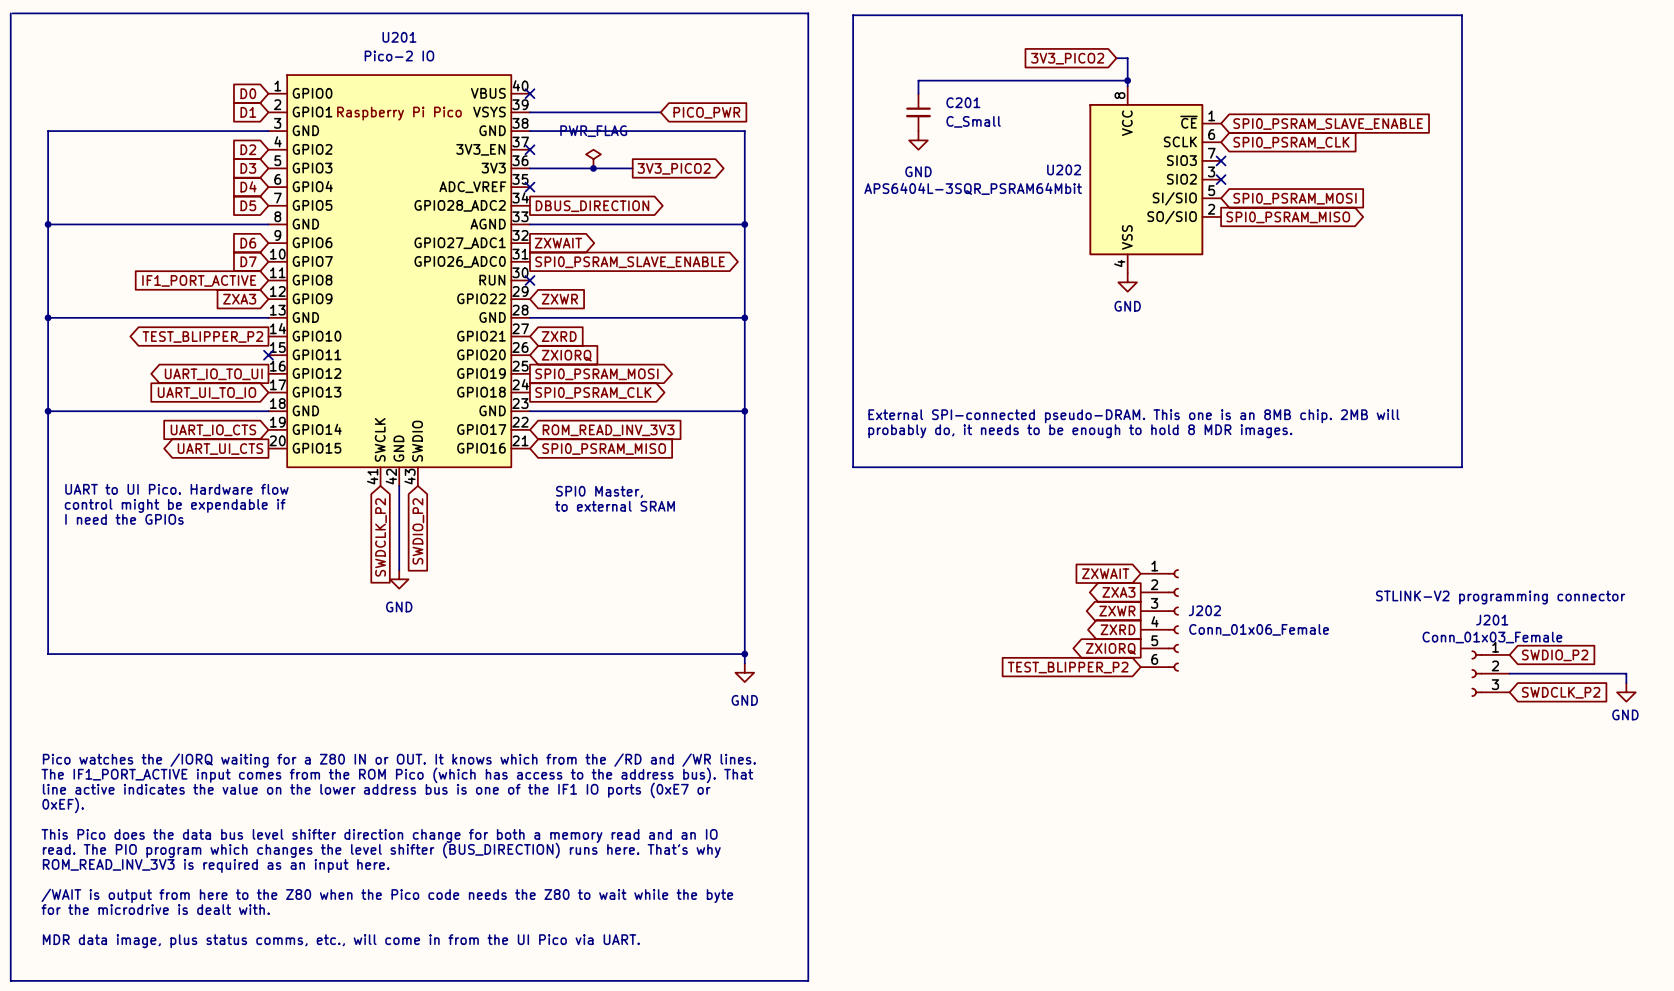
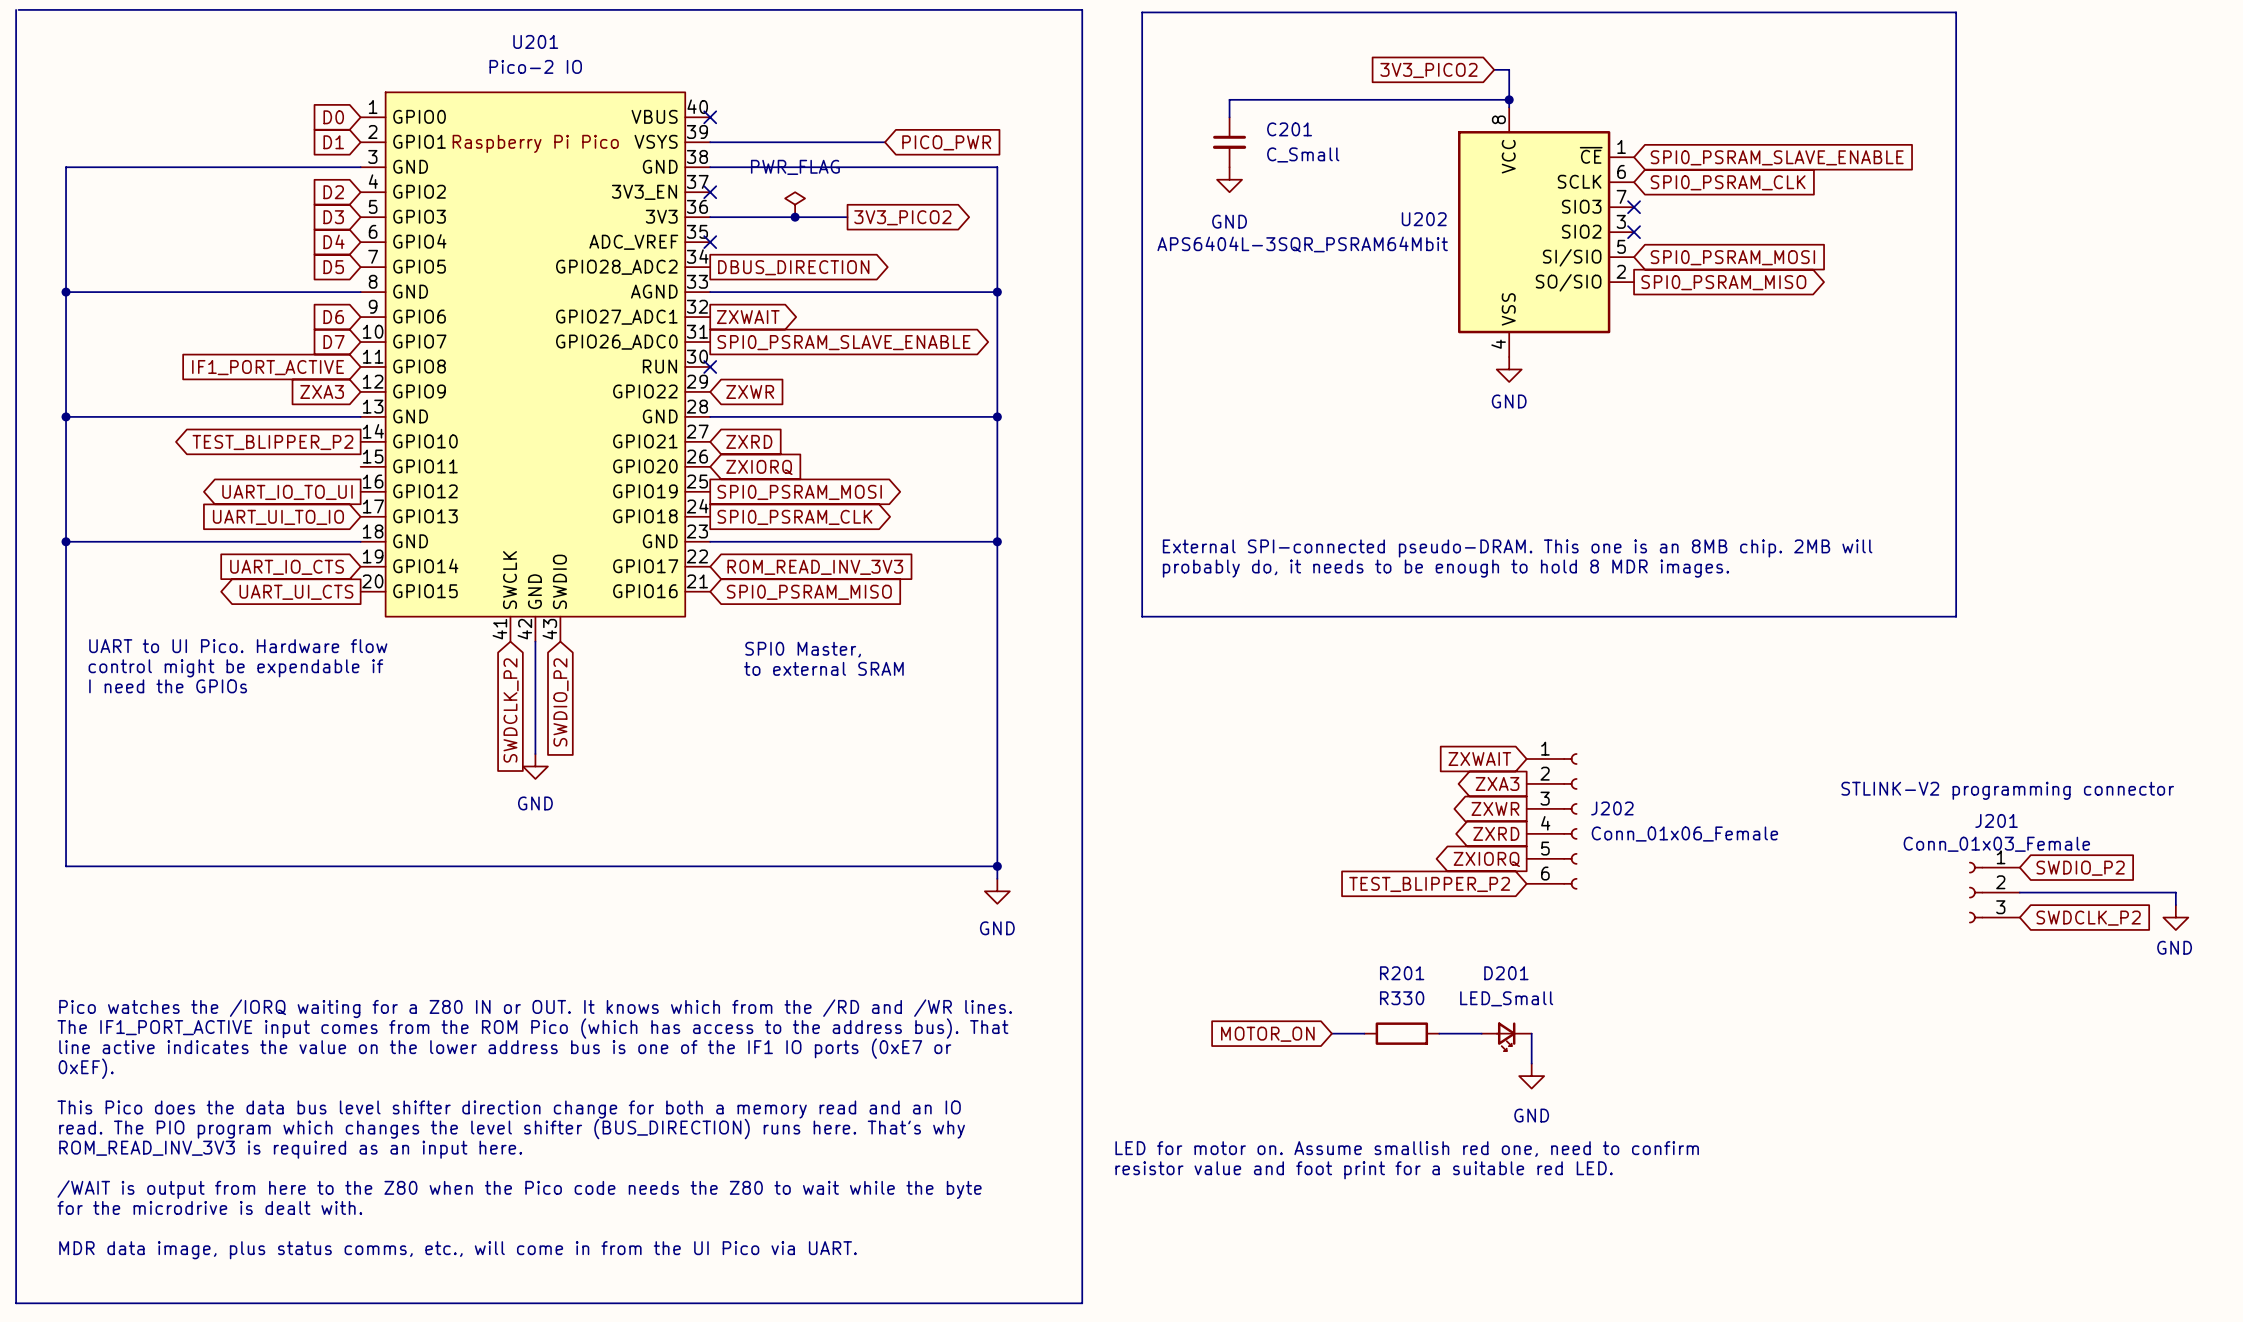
no-connect mark: (268, 355) -> none
global label: none -> MOTOR_ON (1267, 1034)
wire: none -> (1331, 1033) (1364, 1033)
R201: none -> R330 (1401, 1033)
wire: none -> (1439, 1033) (1481, 1033)
wire: none -> (1531, 1033) (1531, 1063)
D201: none -> LED_Small (1506, 1036)
power symbol: none -> GND (1531, 1076)
text: none -> LED for motor on. Assume smallish red one, need to confirm (1407, 1149)
text: none -> resistor value and foot print for a suitable red LED. (1364, 1170)

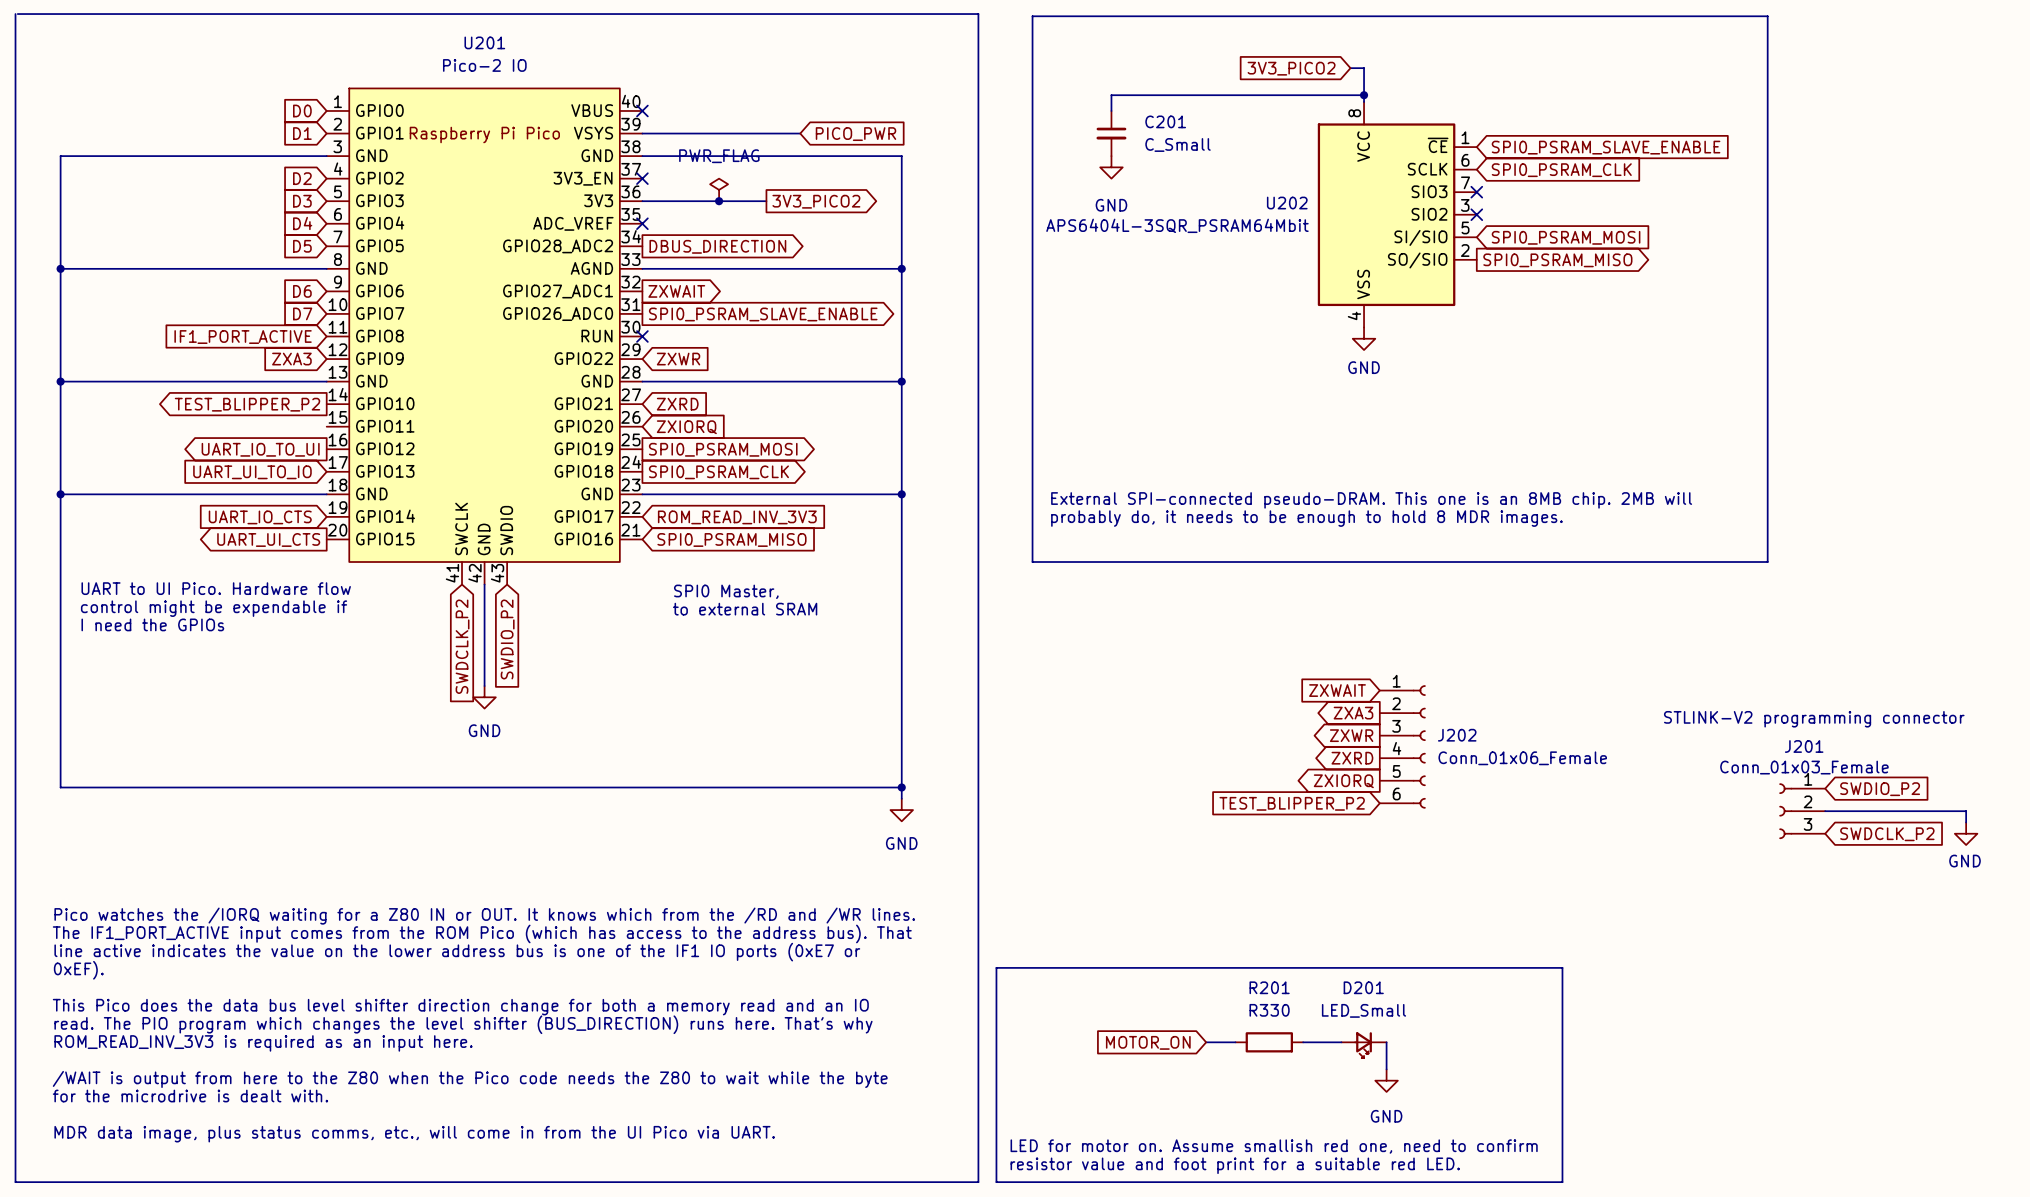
wire: (1331, 1033) (1364, 1033) -> (1206, 1042) (1235, 1042)
R201 position: (1401, 1033) -> (1269, 1042)
wire: (1439, 1033) (1481, 1033) -> (1303, 1042) (1341, 1042)
wire: (1531, 1033) (1531, 1063) -> (1386, 1042) (1386, 1069)
global label position: MOTOR_ON (1267, 1034) -> MOTOR_ON (1148, 1042)
D201 position: (1506, 1036) -> (1364, 1045)
line: none -> (996, 967) (1562, 967) (1562, 1182) (996, 1182) (996, 967)
power symbol position: GND (1531, 1076) -> GND (1386, 1080)
text position: LED for motor on. Assume smallish red one, need to confirm (1407, 1149) -> LED for motor on. Assume smallish red one, need to confirm (1274, 1146)
text position: resistor value and foot print for a suitable red LED. (1364, 1170) -> resistor value and foot print for a suitable red LED. (1235, 1165)

